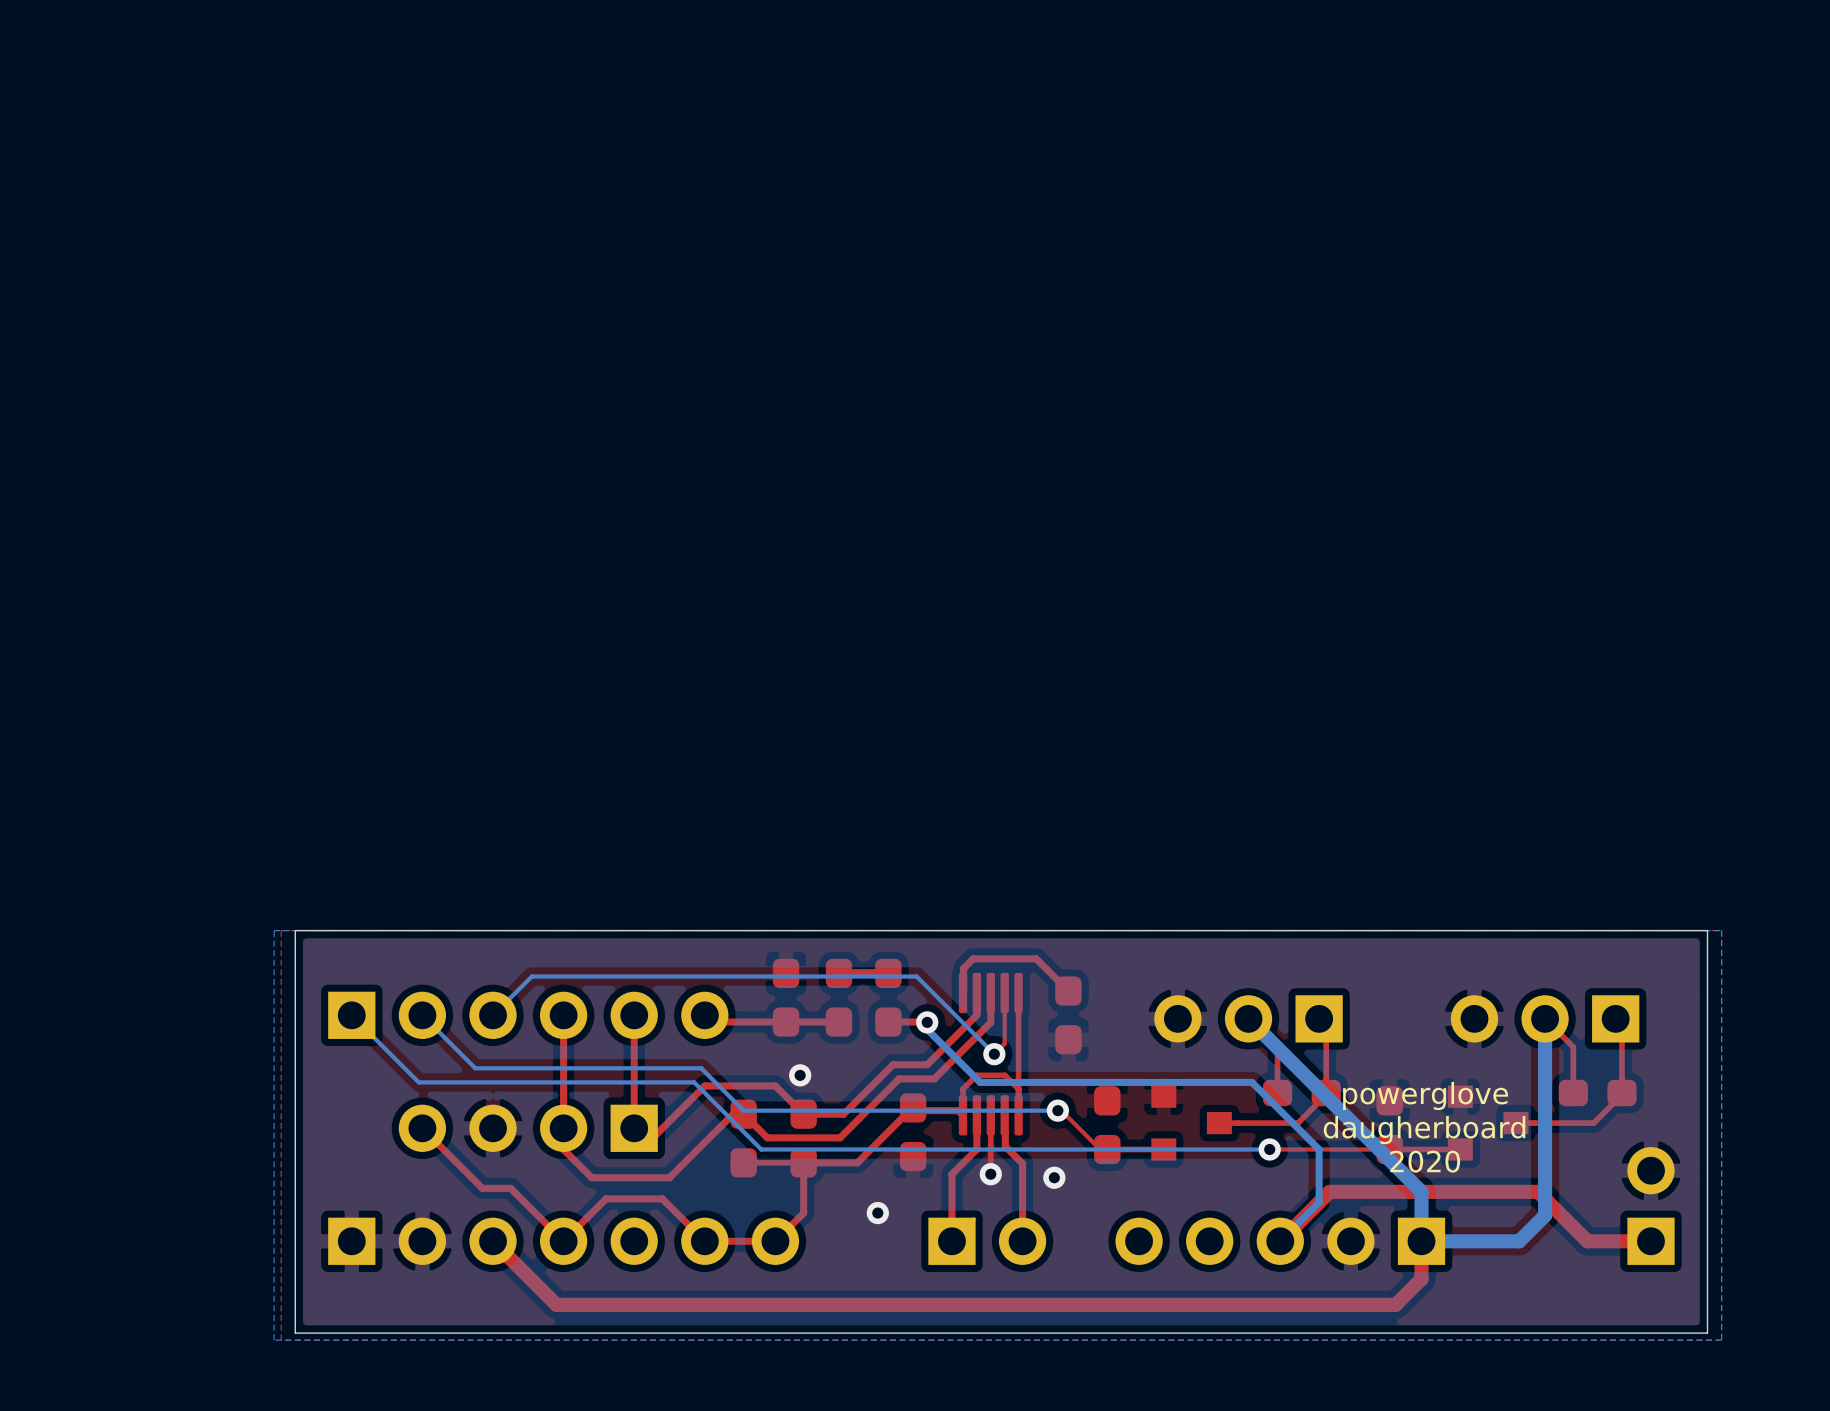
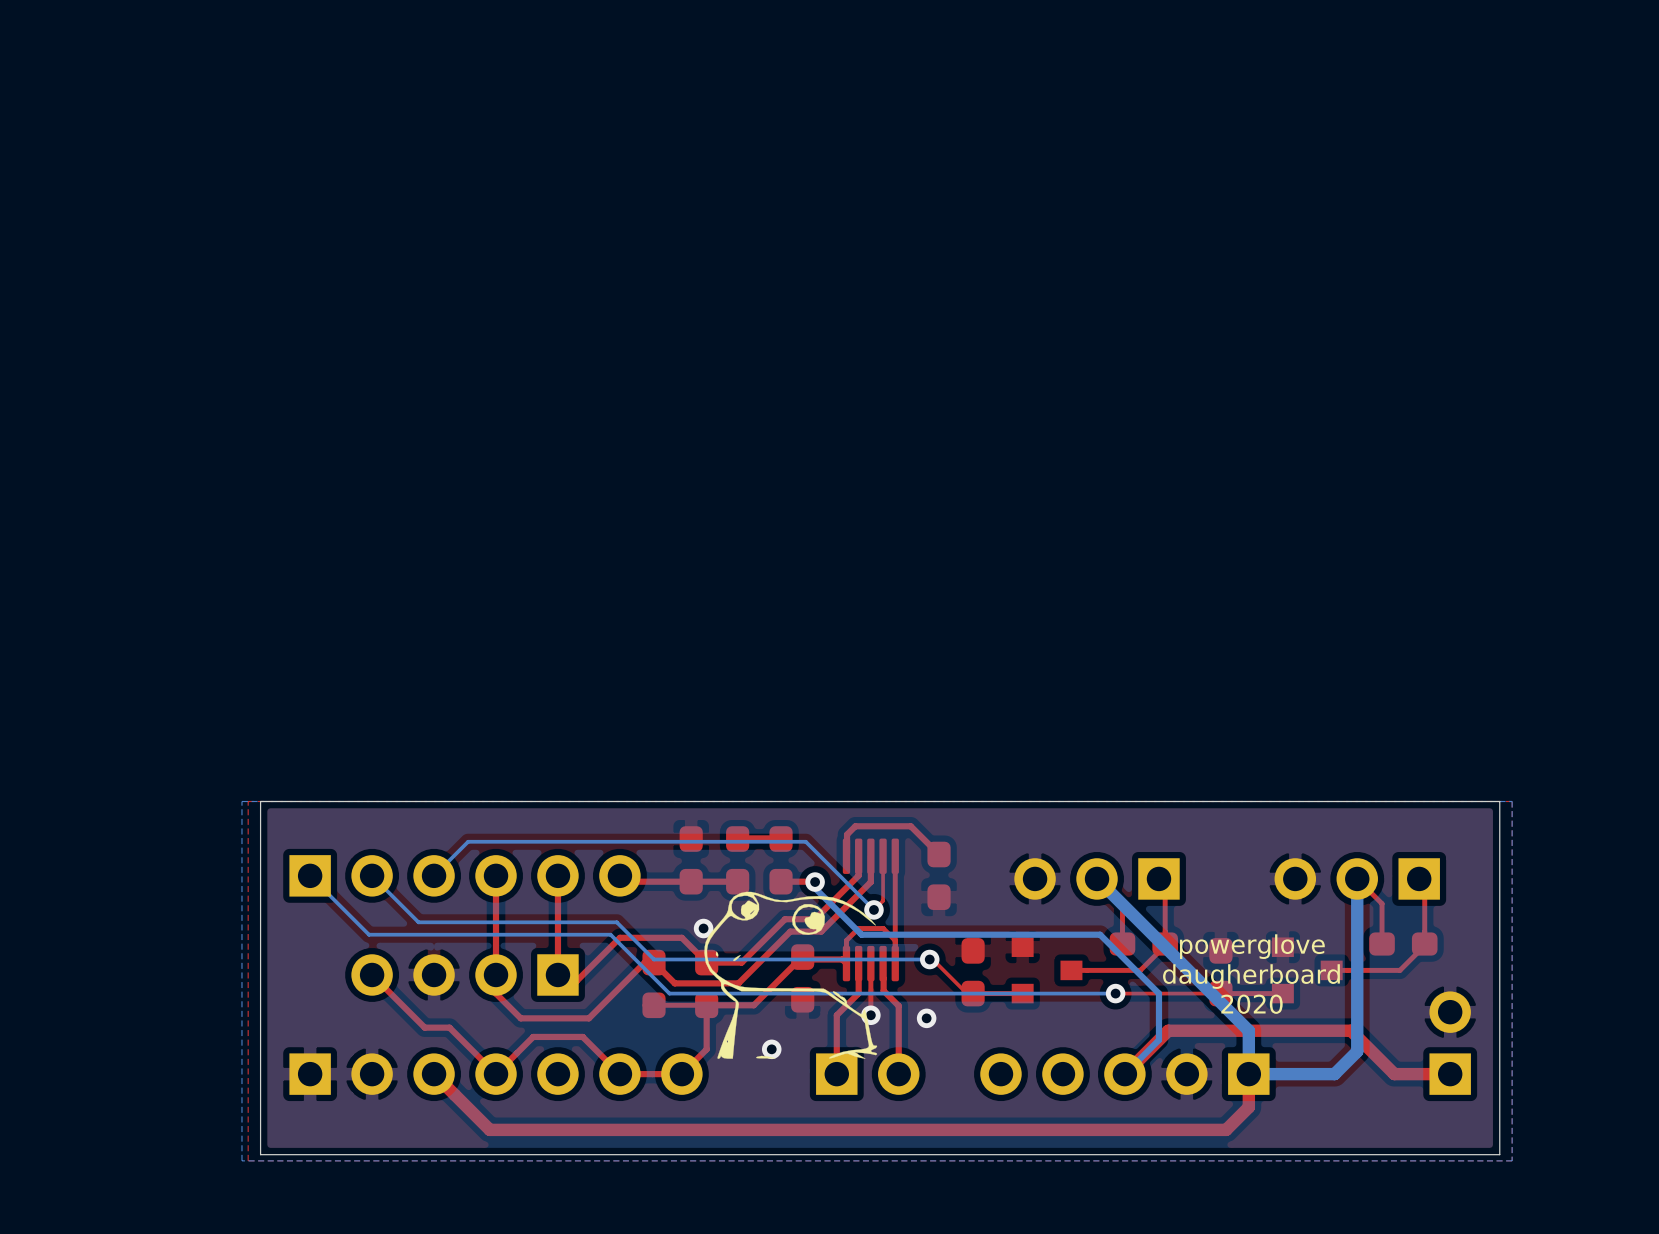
drawing: none -> [704, 891, 878, 1059]

